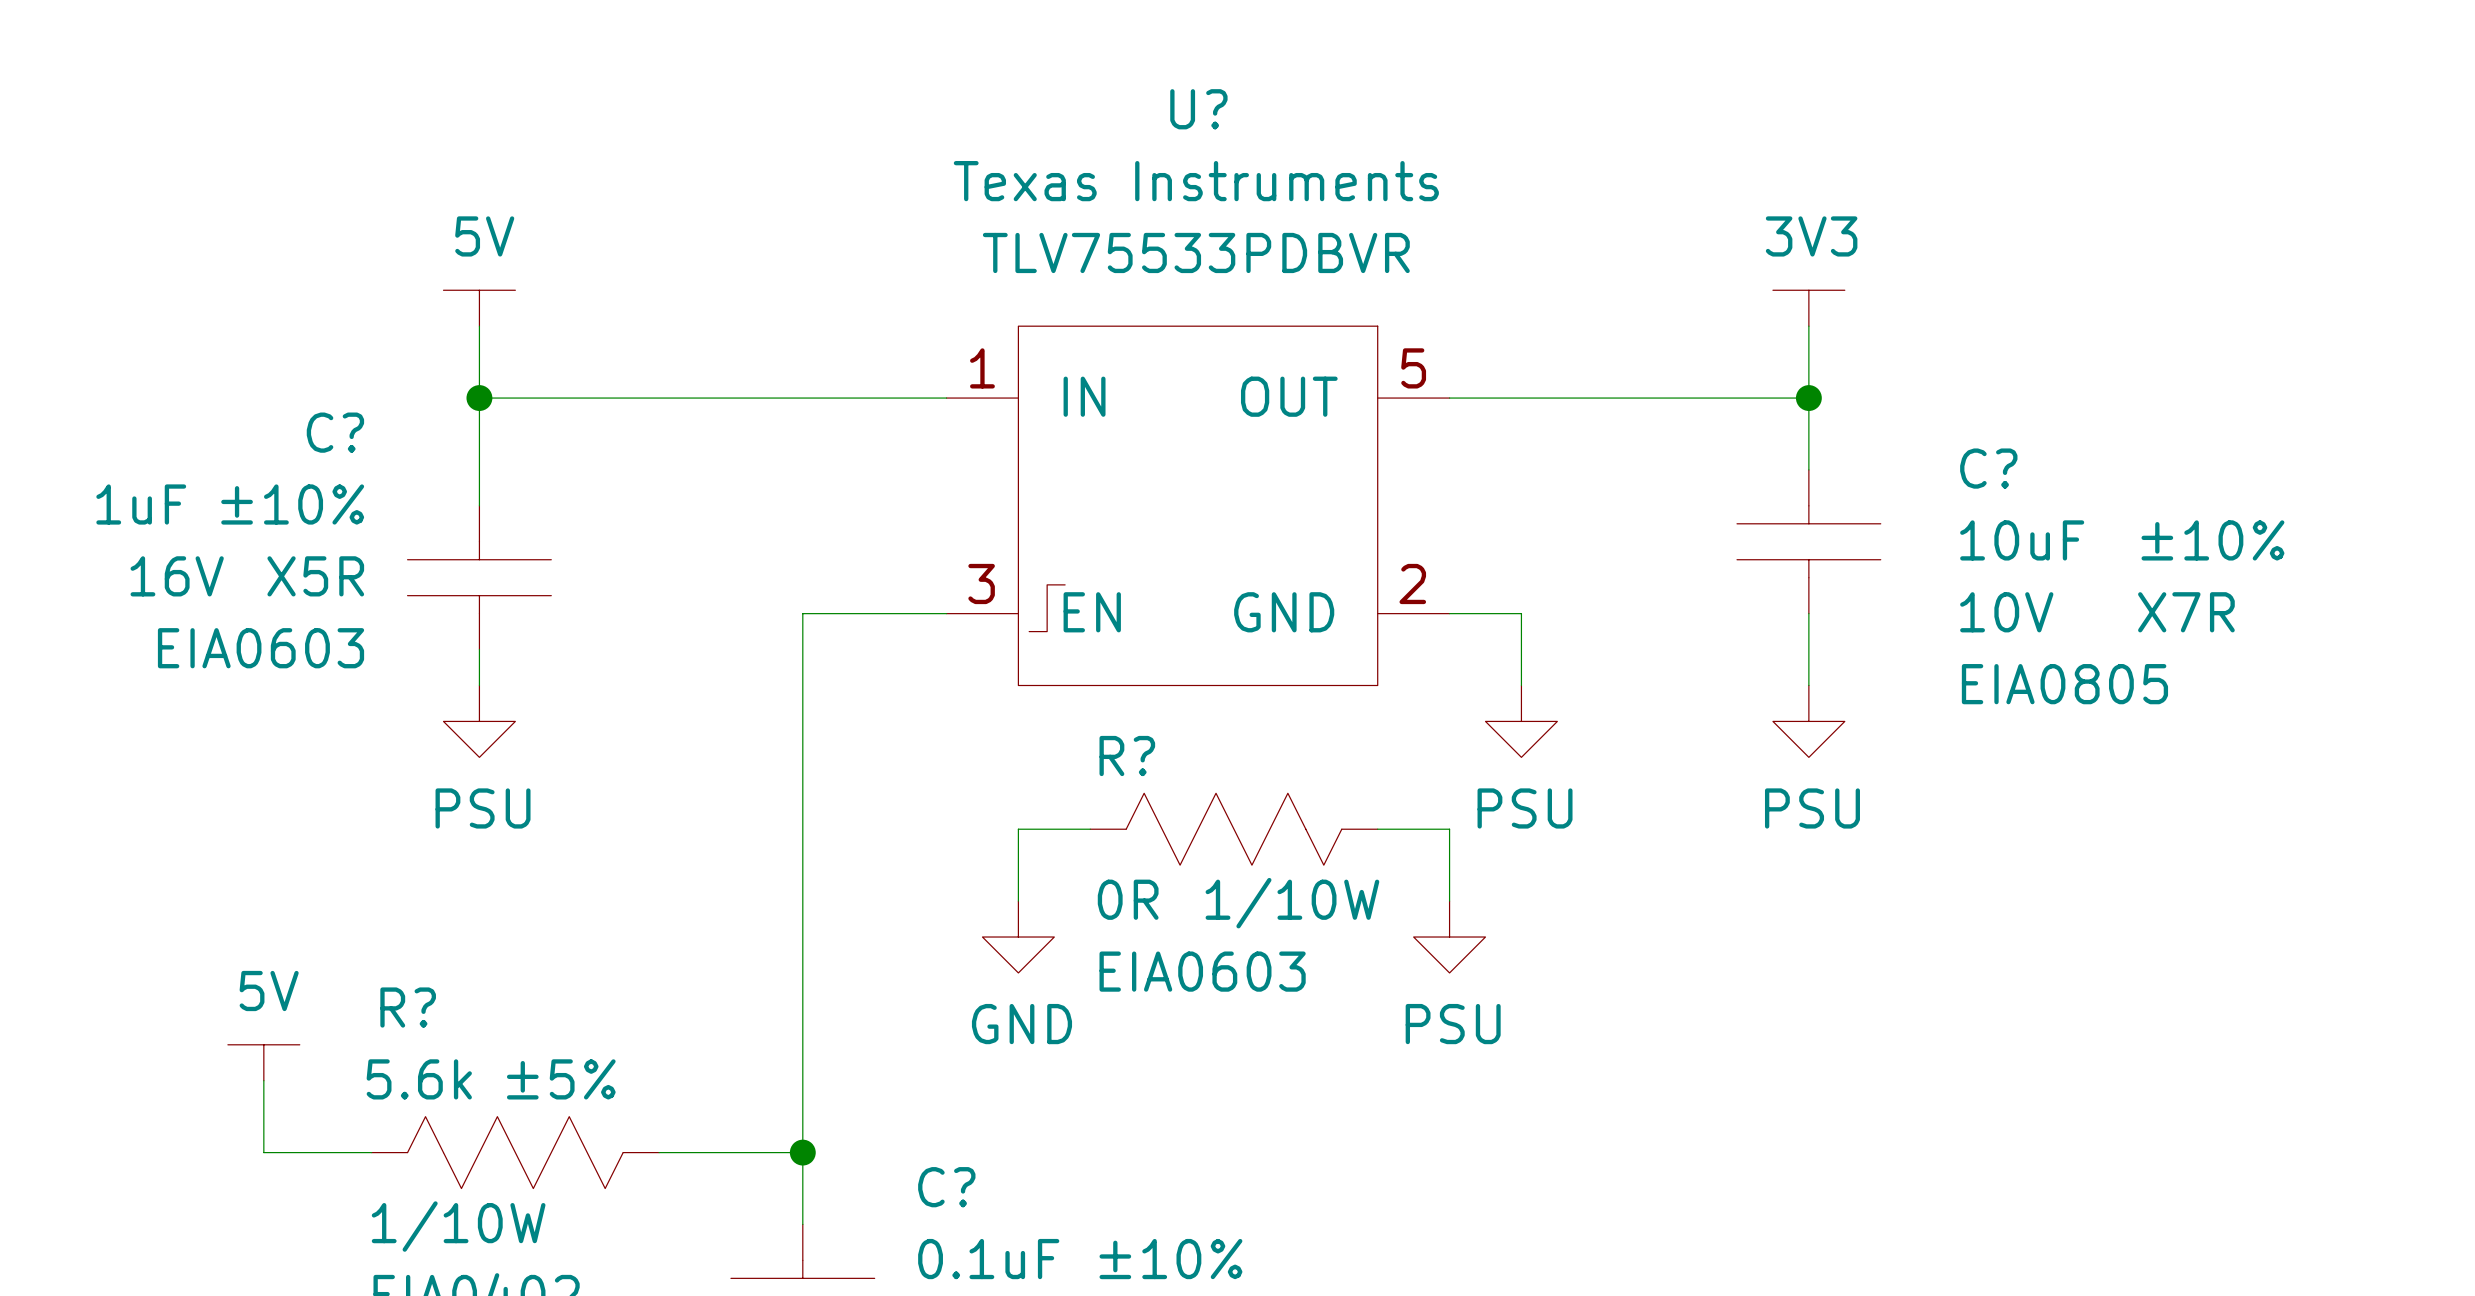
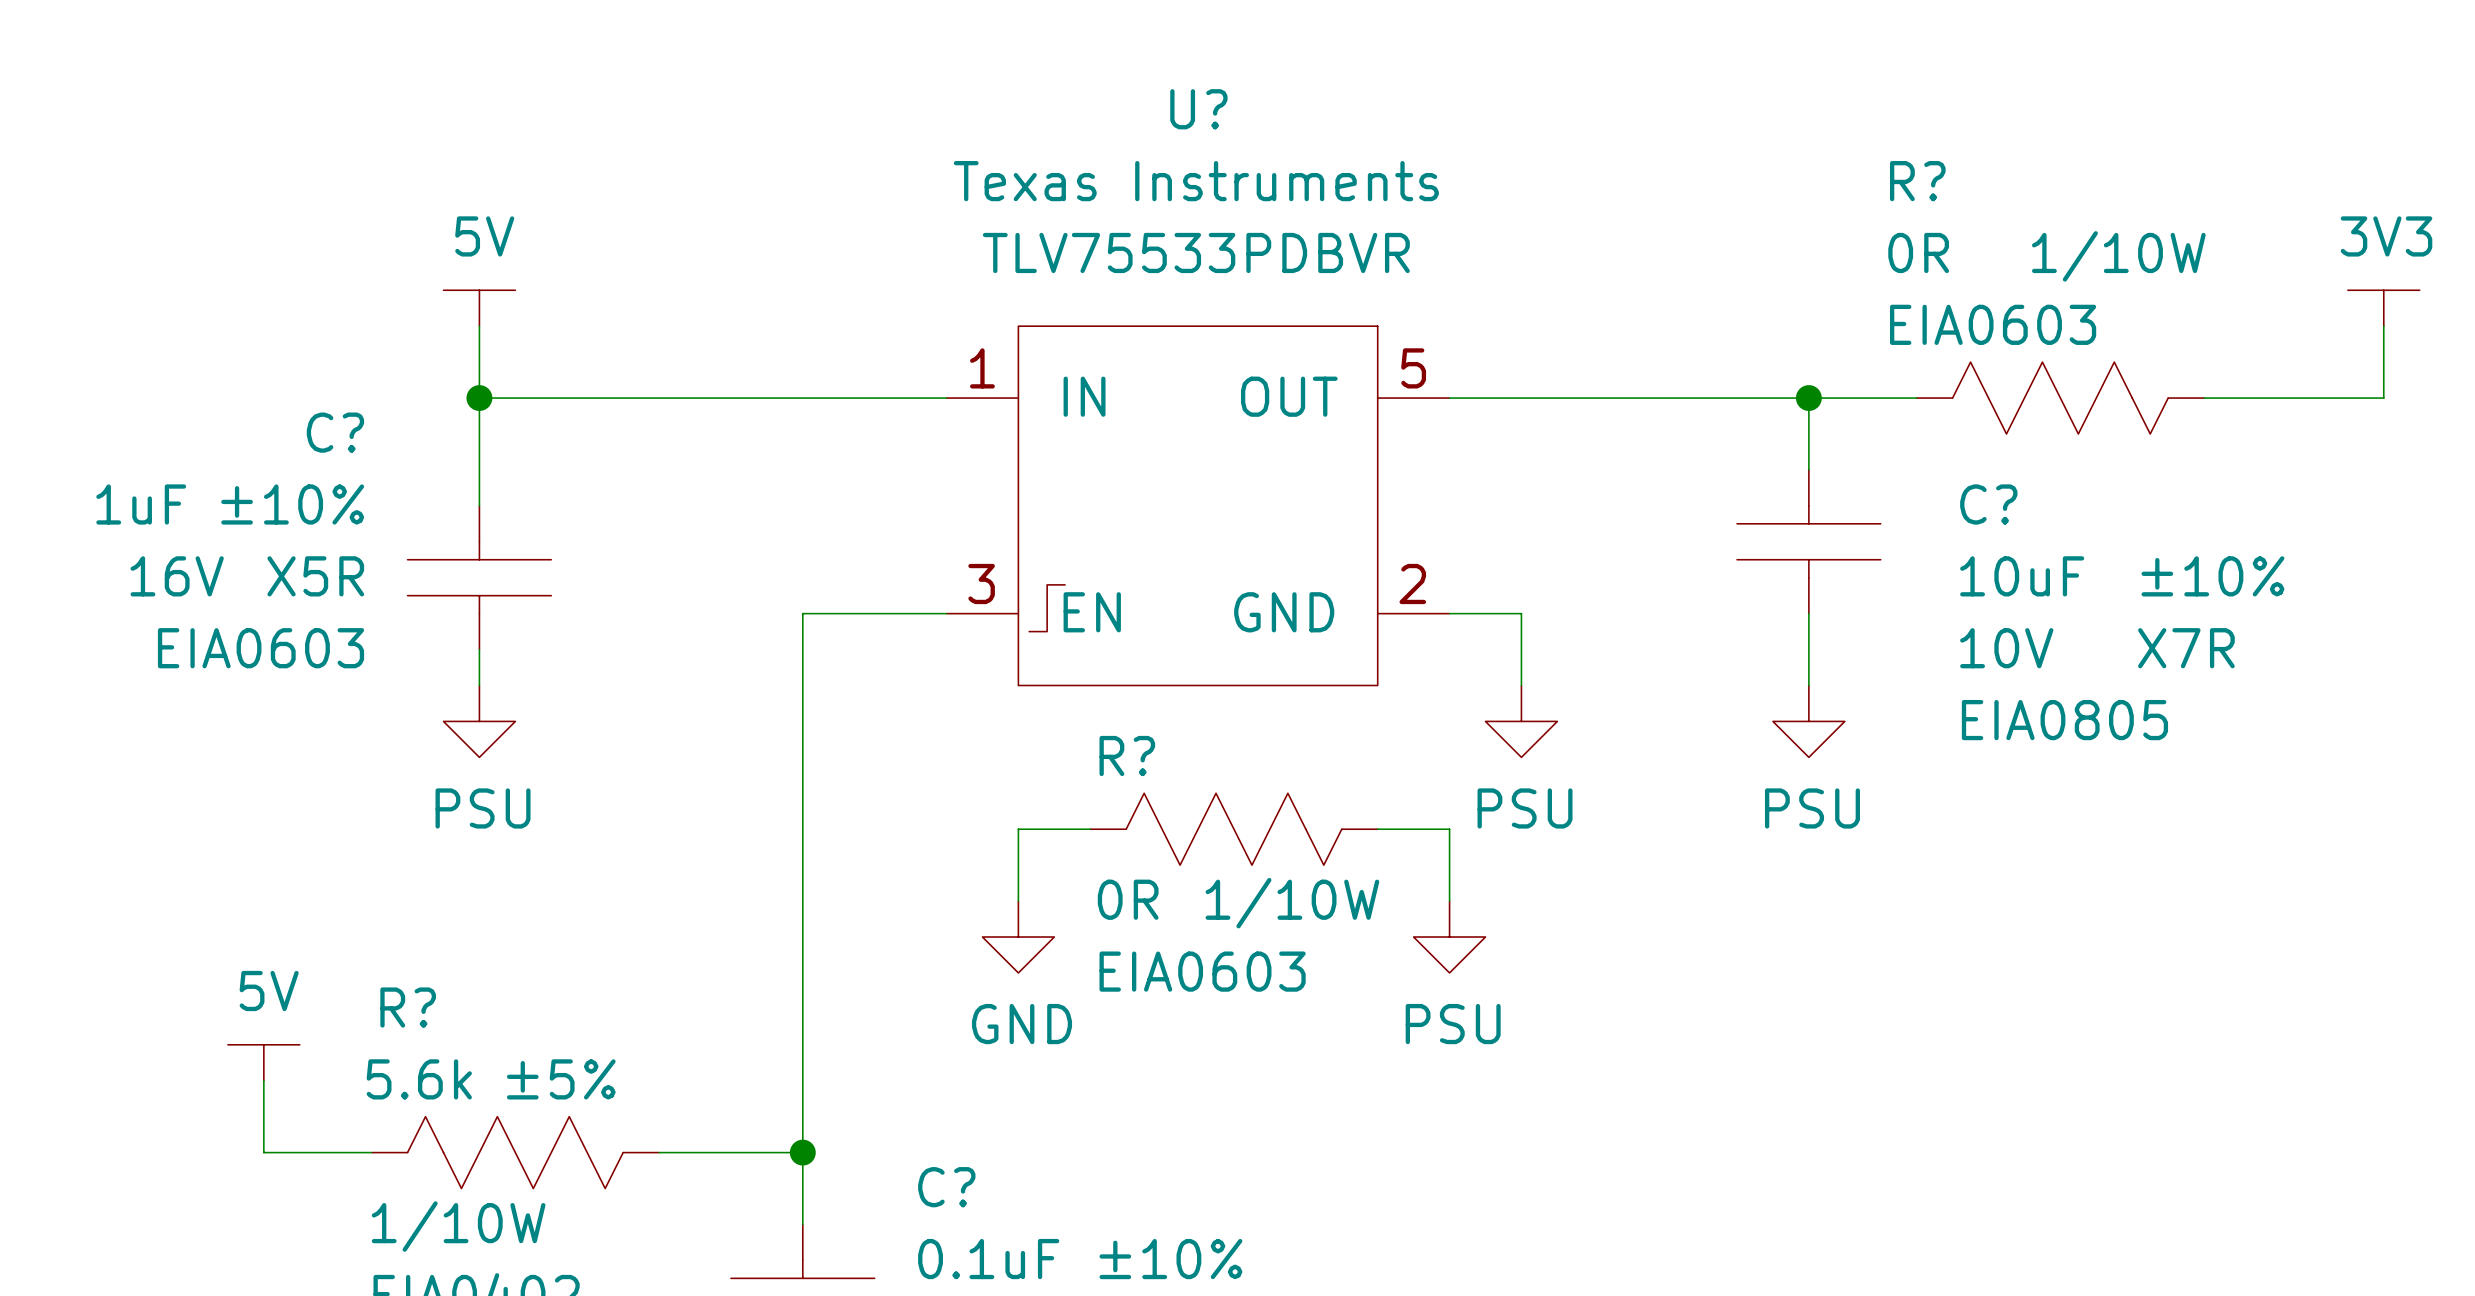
power symbol position: 3V3 (1808, 308) -> 3V3 (2383, 308)
wire: (1808, 326) (1808, 398) -> (1916, 398) (1808, 398)
wire: none -> (2383, 326) (2383, 398) (2204, 398)
R?: none -> (2060, 398)
C? name position: C? (1988, 468) -> C? (1988, 504)
C? text position: 10uF (2022, 540) -> 10uF (2022, 576)
C? text position: ±10% (2212, 540) -> ±10% (2212, 576)
C? text position: 10V (2006, 612) -> 10V (2006, 648)
C? text position: X7R (2186, 612) -> X7R (2186, 648)
C? text position: EIA0805 (2064, 684) -> EIA0805 (2064, 720)

